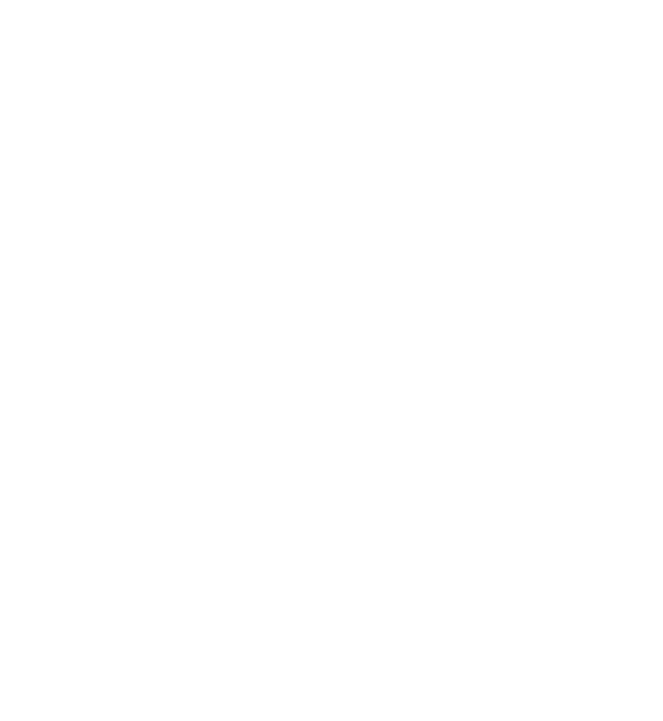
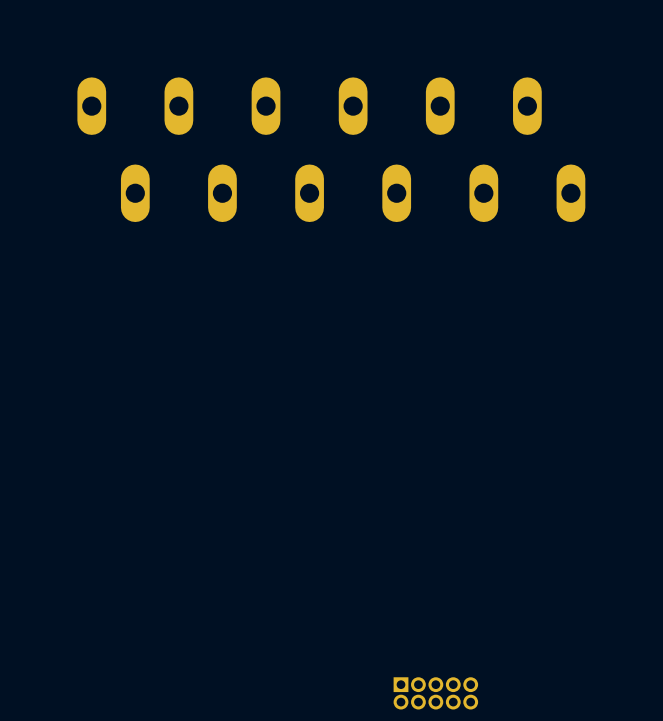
part: none -> (331, 149)
part: none -> (435, 693)

